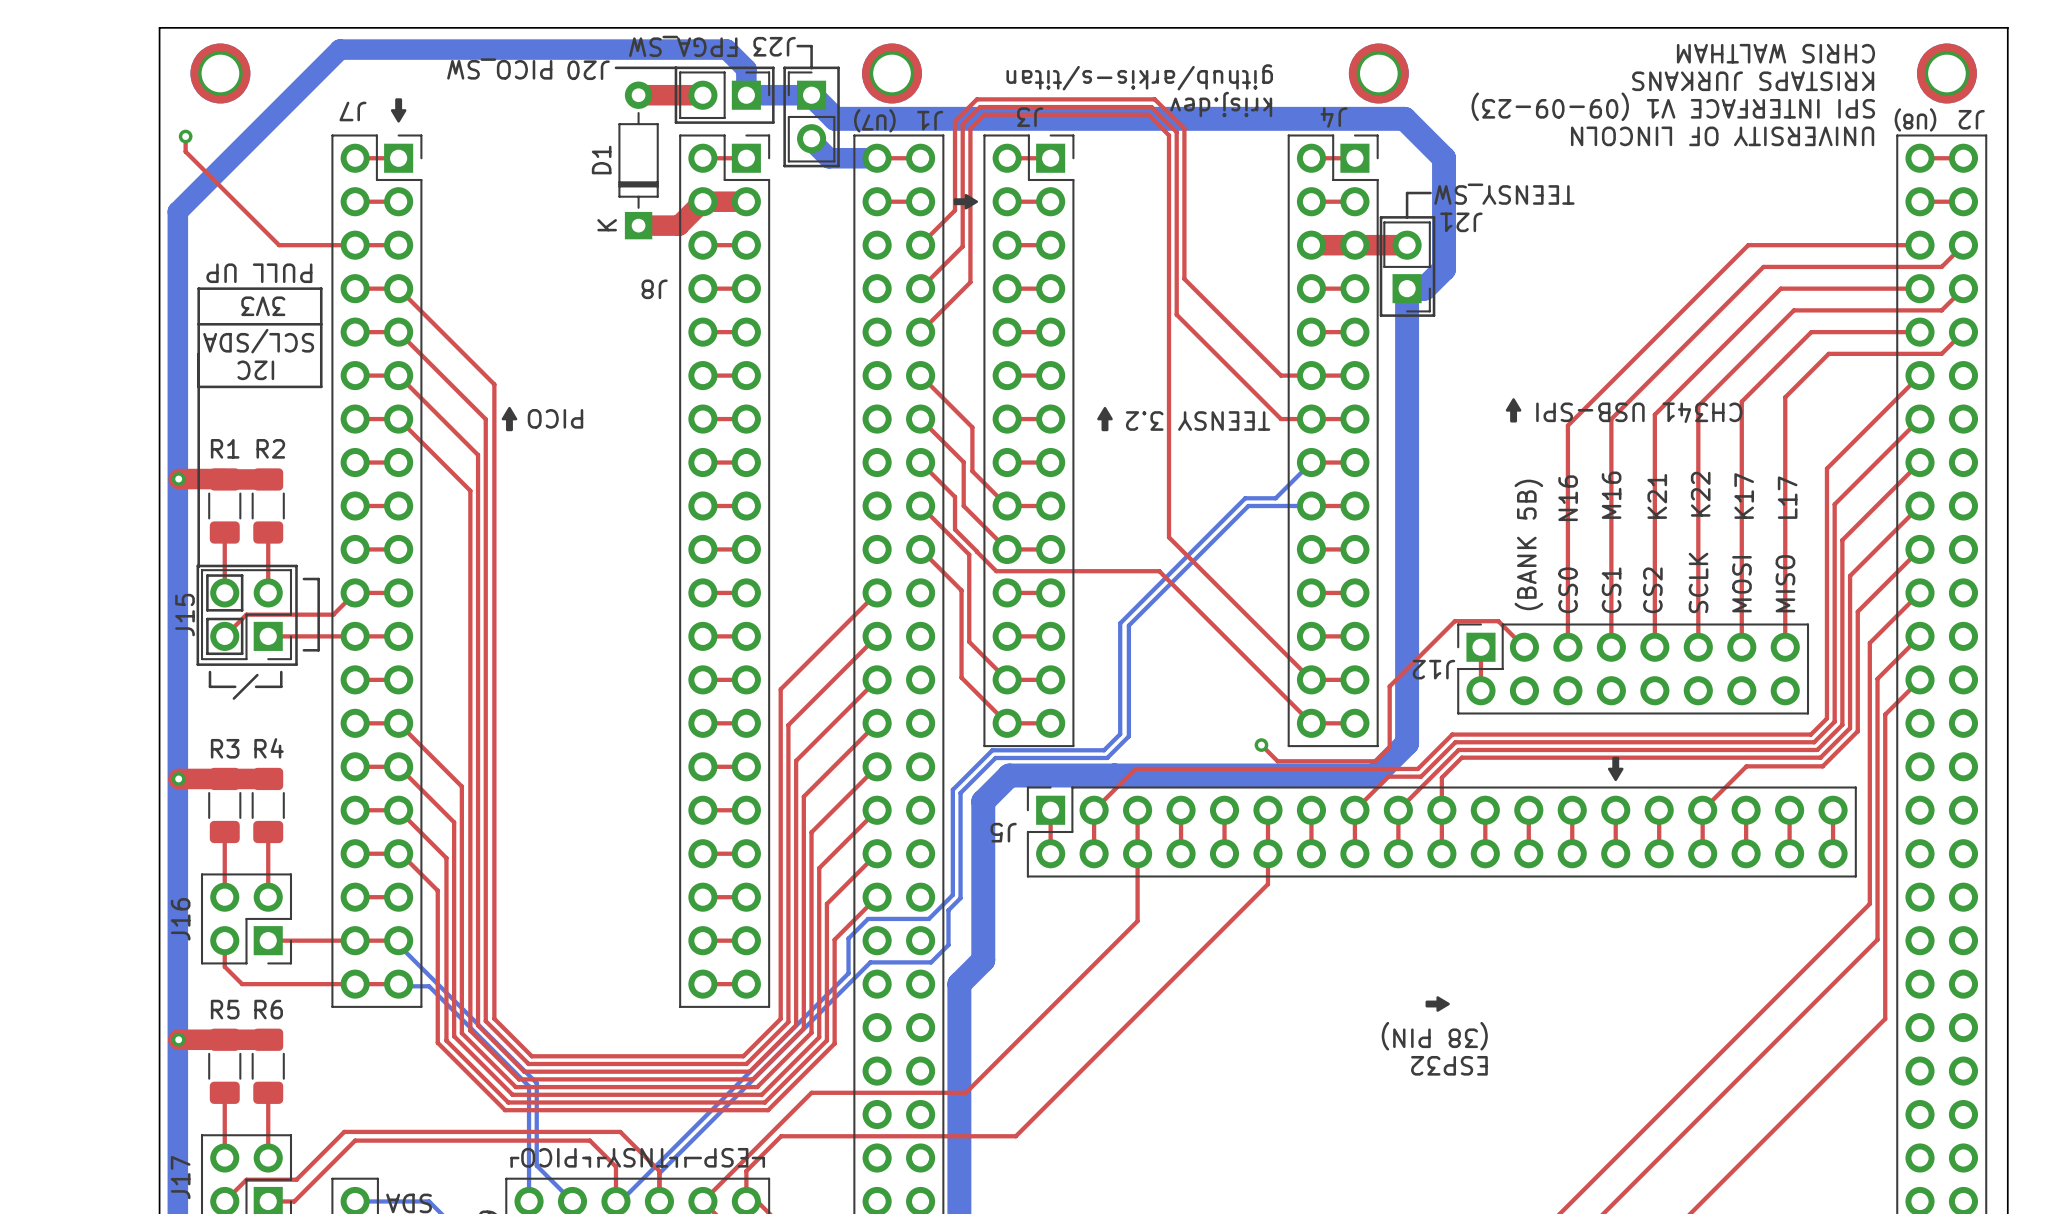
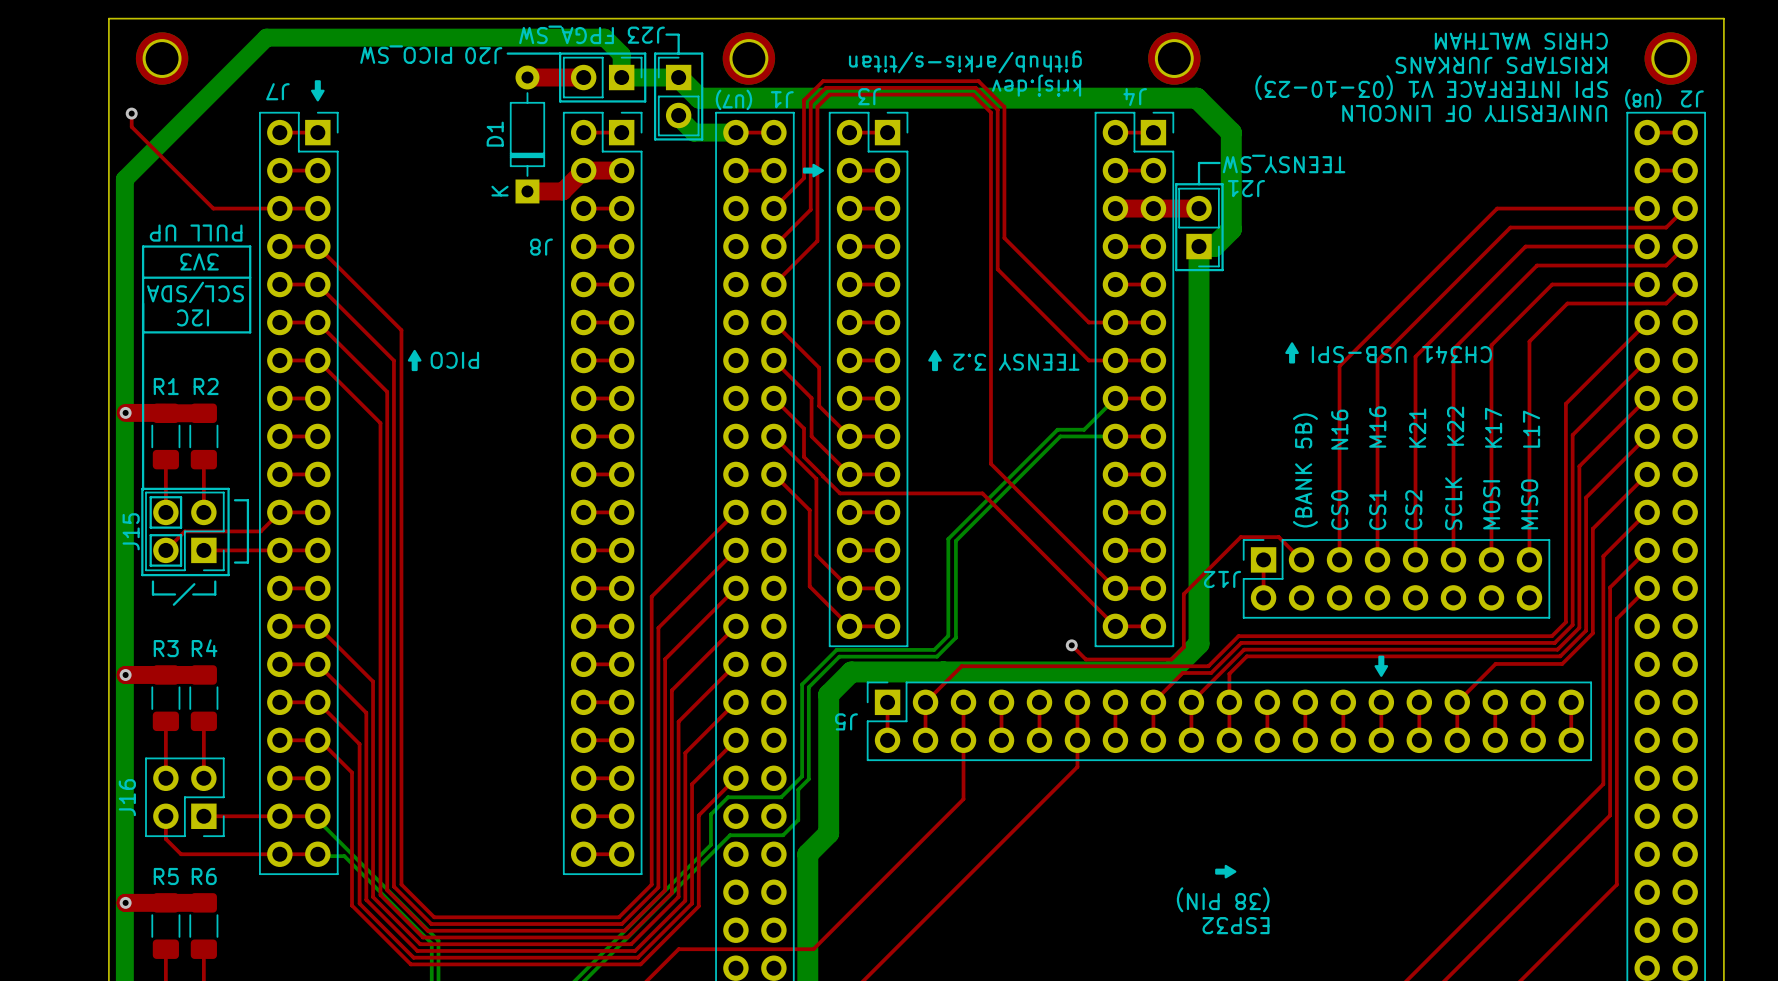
text: SPI INTERFACE V1 (09-09-23) (1673, 106) -> SPI INTERFACE V1 (03-10-23) (1431, 87)

